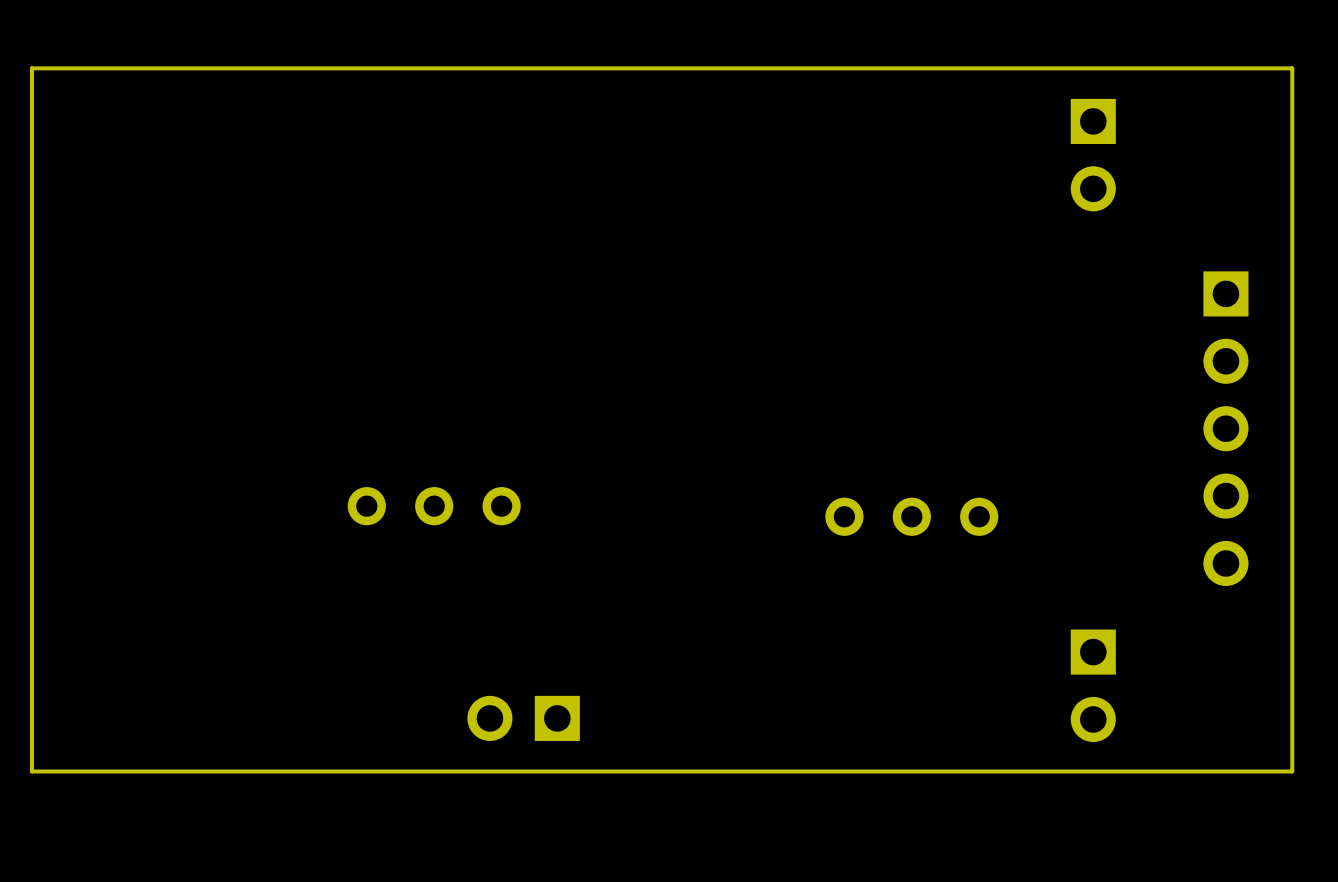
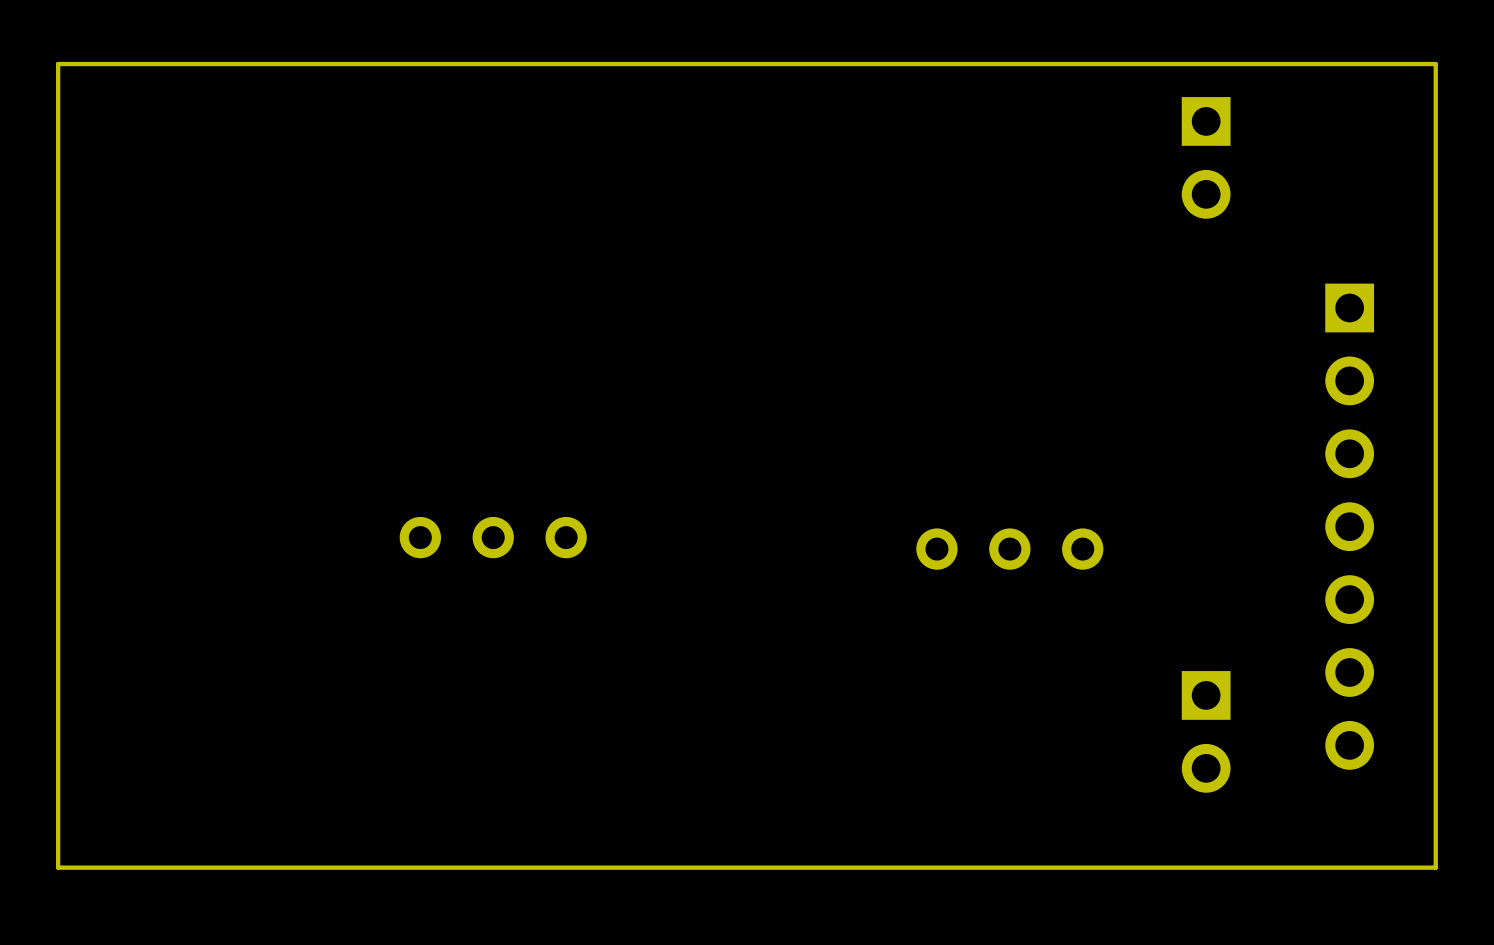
board edge: (1292, 68) (1292, 771) (31, 771) -> (1421, 64) (1435, 64) (1435, 867) (58, 867) (58, 824)
part: none -> (1349, 526)
part: (523, 718) -> none

